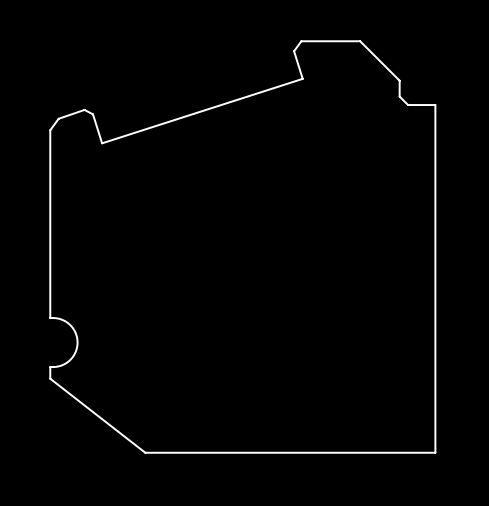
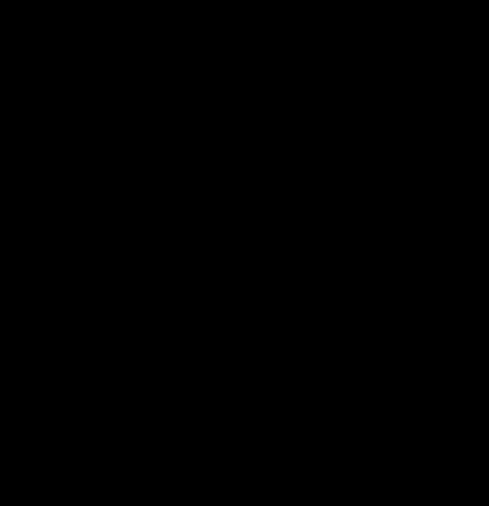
board edge: (301, 41) (360, 41) (399, 80) (399, 96) (408, 105) (435, 105) (435, 452) (145, 452) (50, 378) (50, 367) (62, 365) (70, 359) (75, 351) (77, 342) (75, 333) (70, 325) (62, 319) (50, 318) (50, 130) (58, 118) (84, 109) (93, 114) (102, 143) (302, 78) (294, 51) (301, 41) -> none

